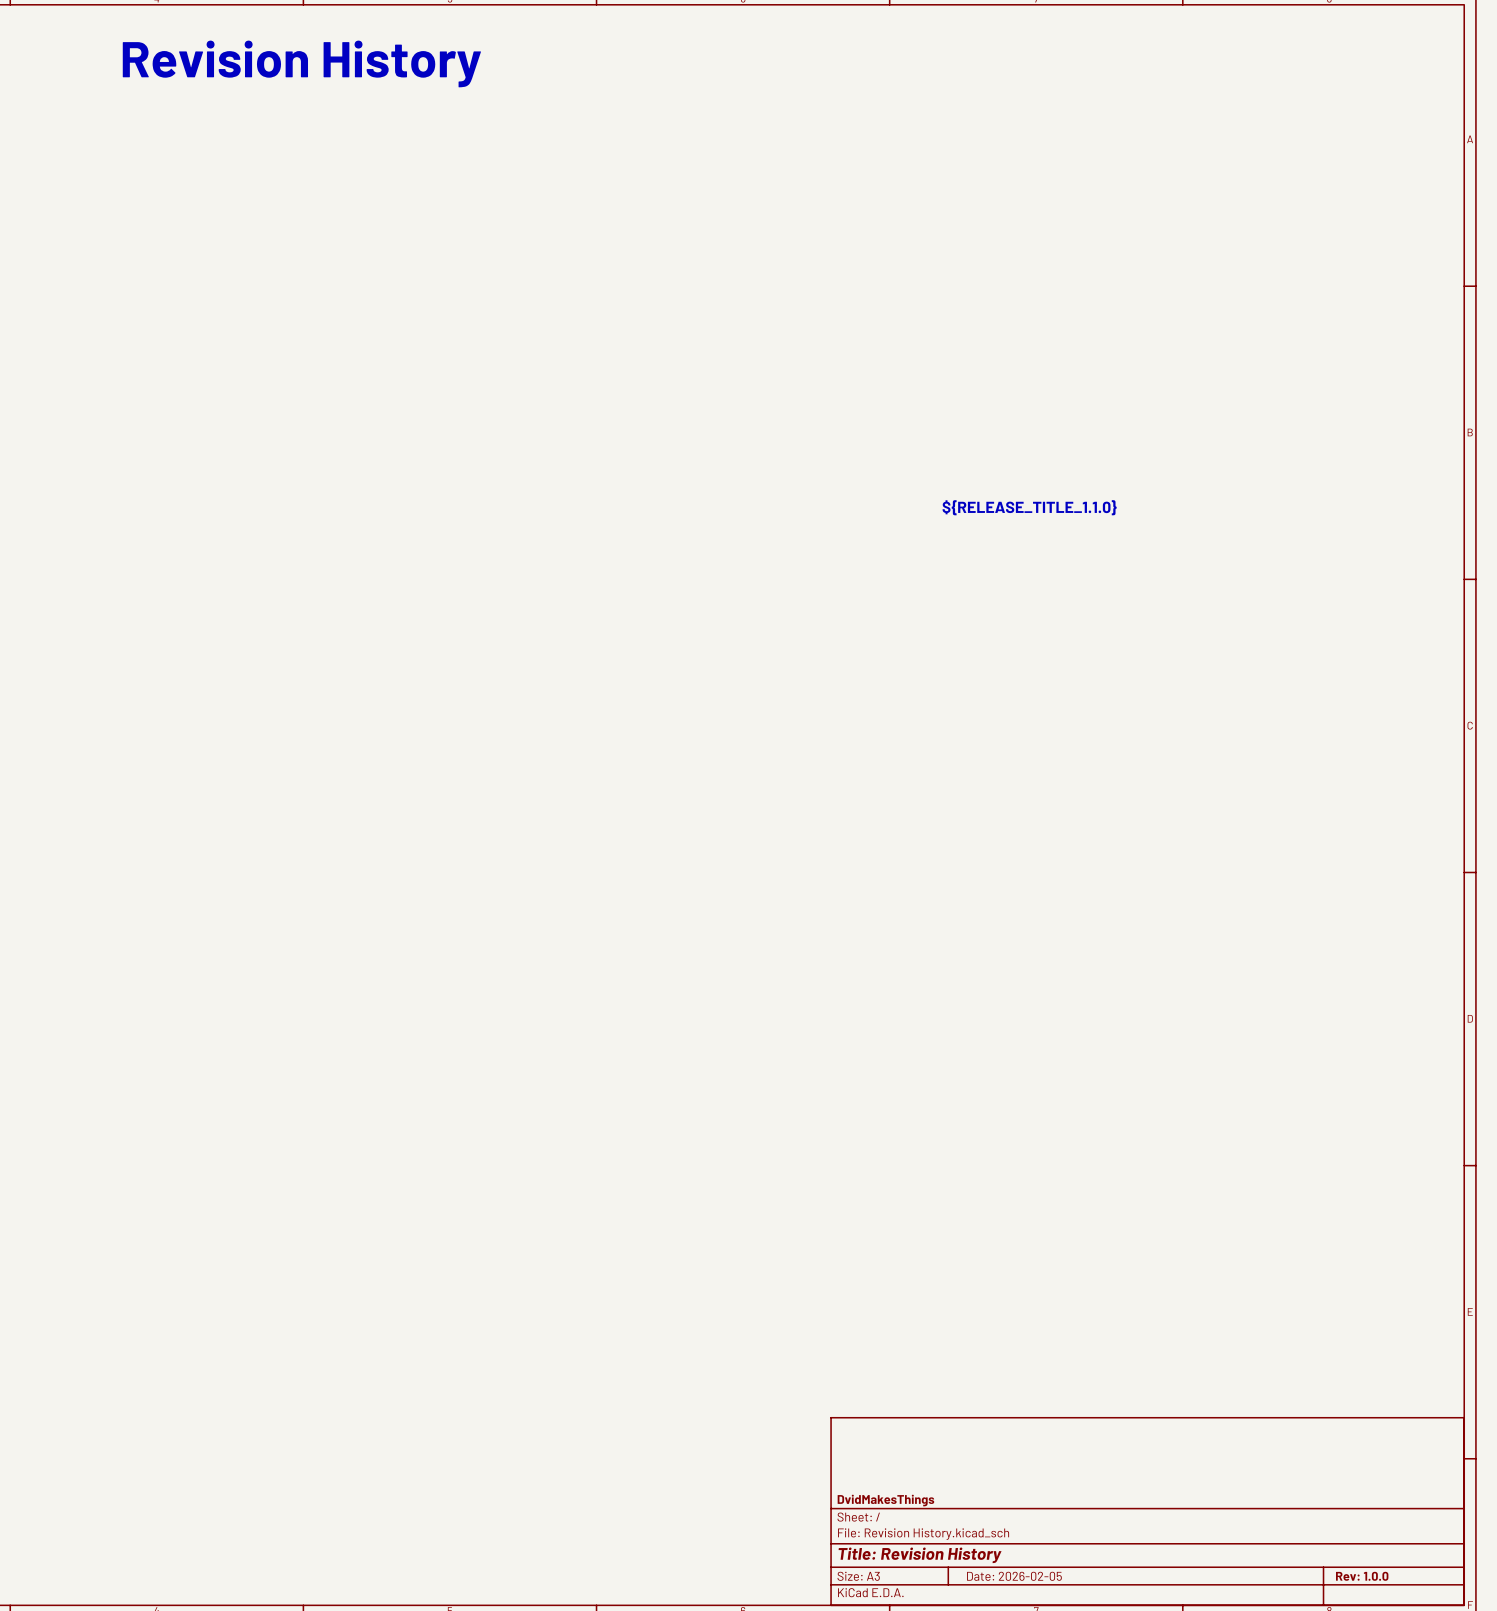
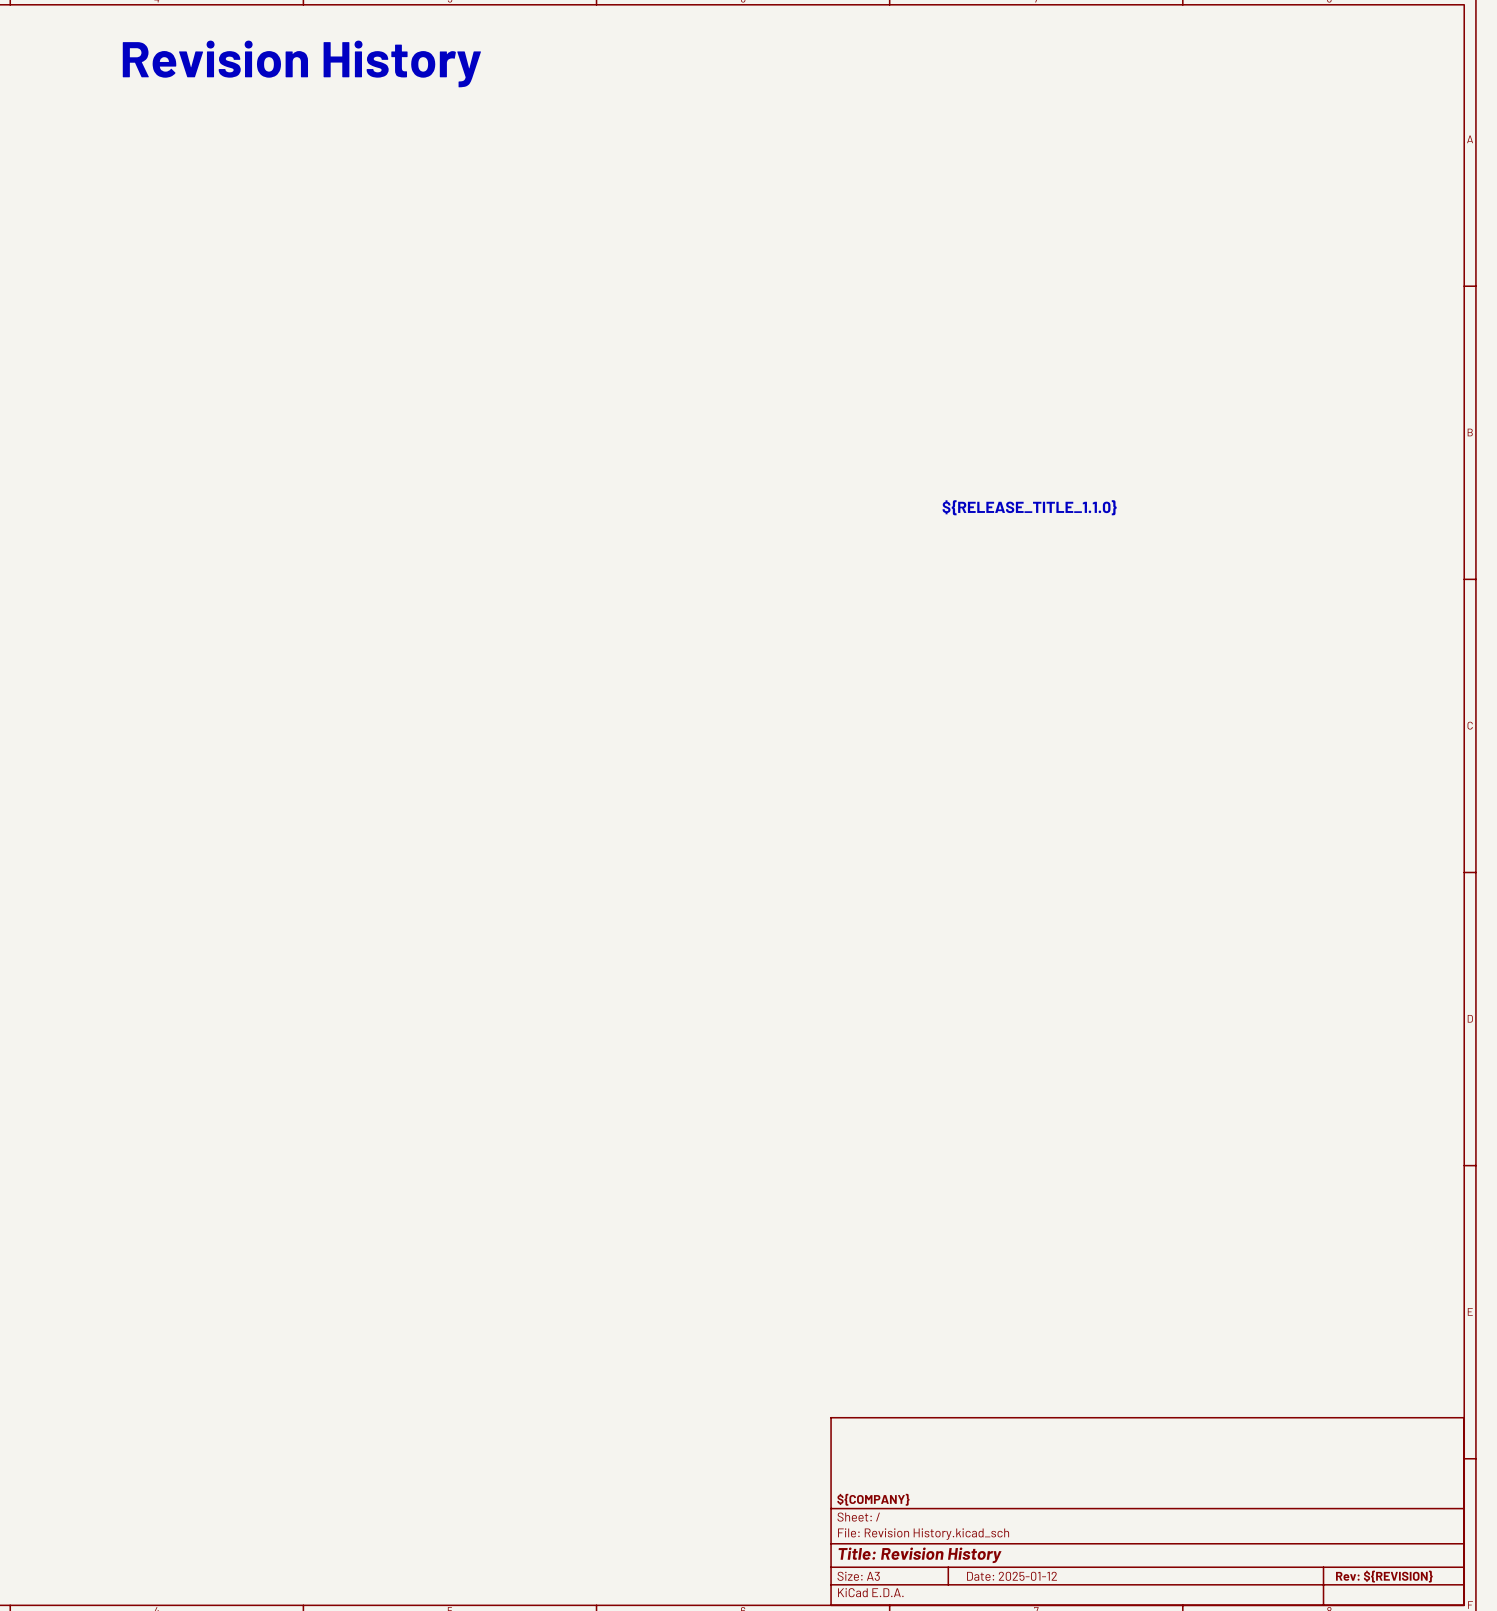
title block: DvidMakesThings (885, 1500) -> ${COMPANY} (873, 1499)
title block: Date: 2026-02-05 (1014, 1576) -> Date: 2025-01-12 (1012, 1576)
title block: Rev: 1.0.0 (1362, 1576) -> Rev: ${REVISION} (1384, 1576)

